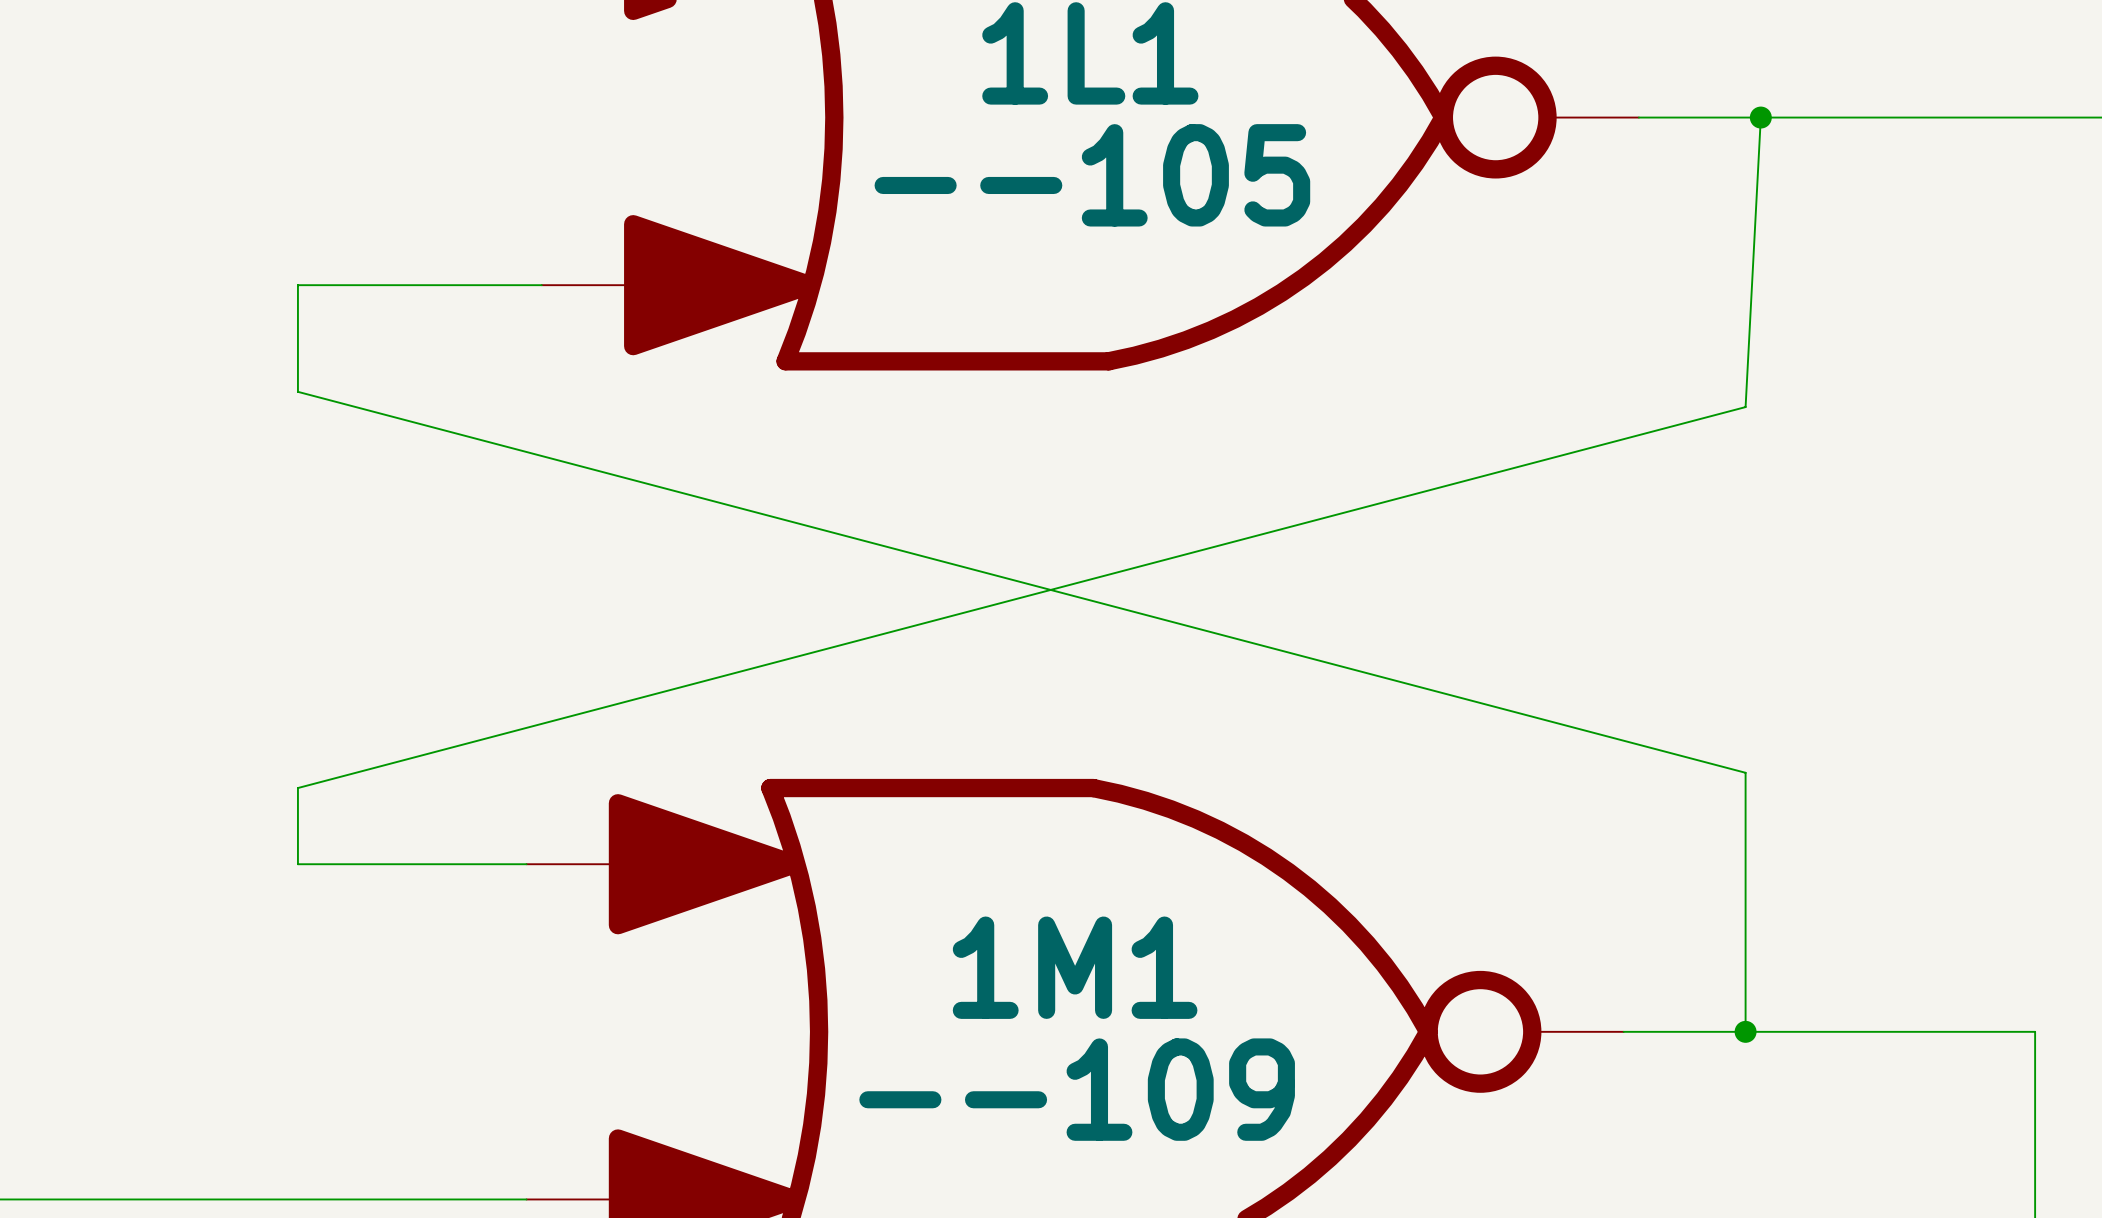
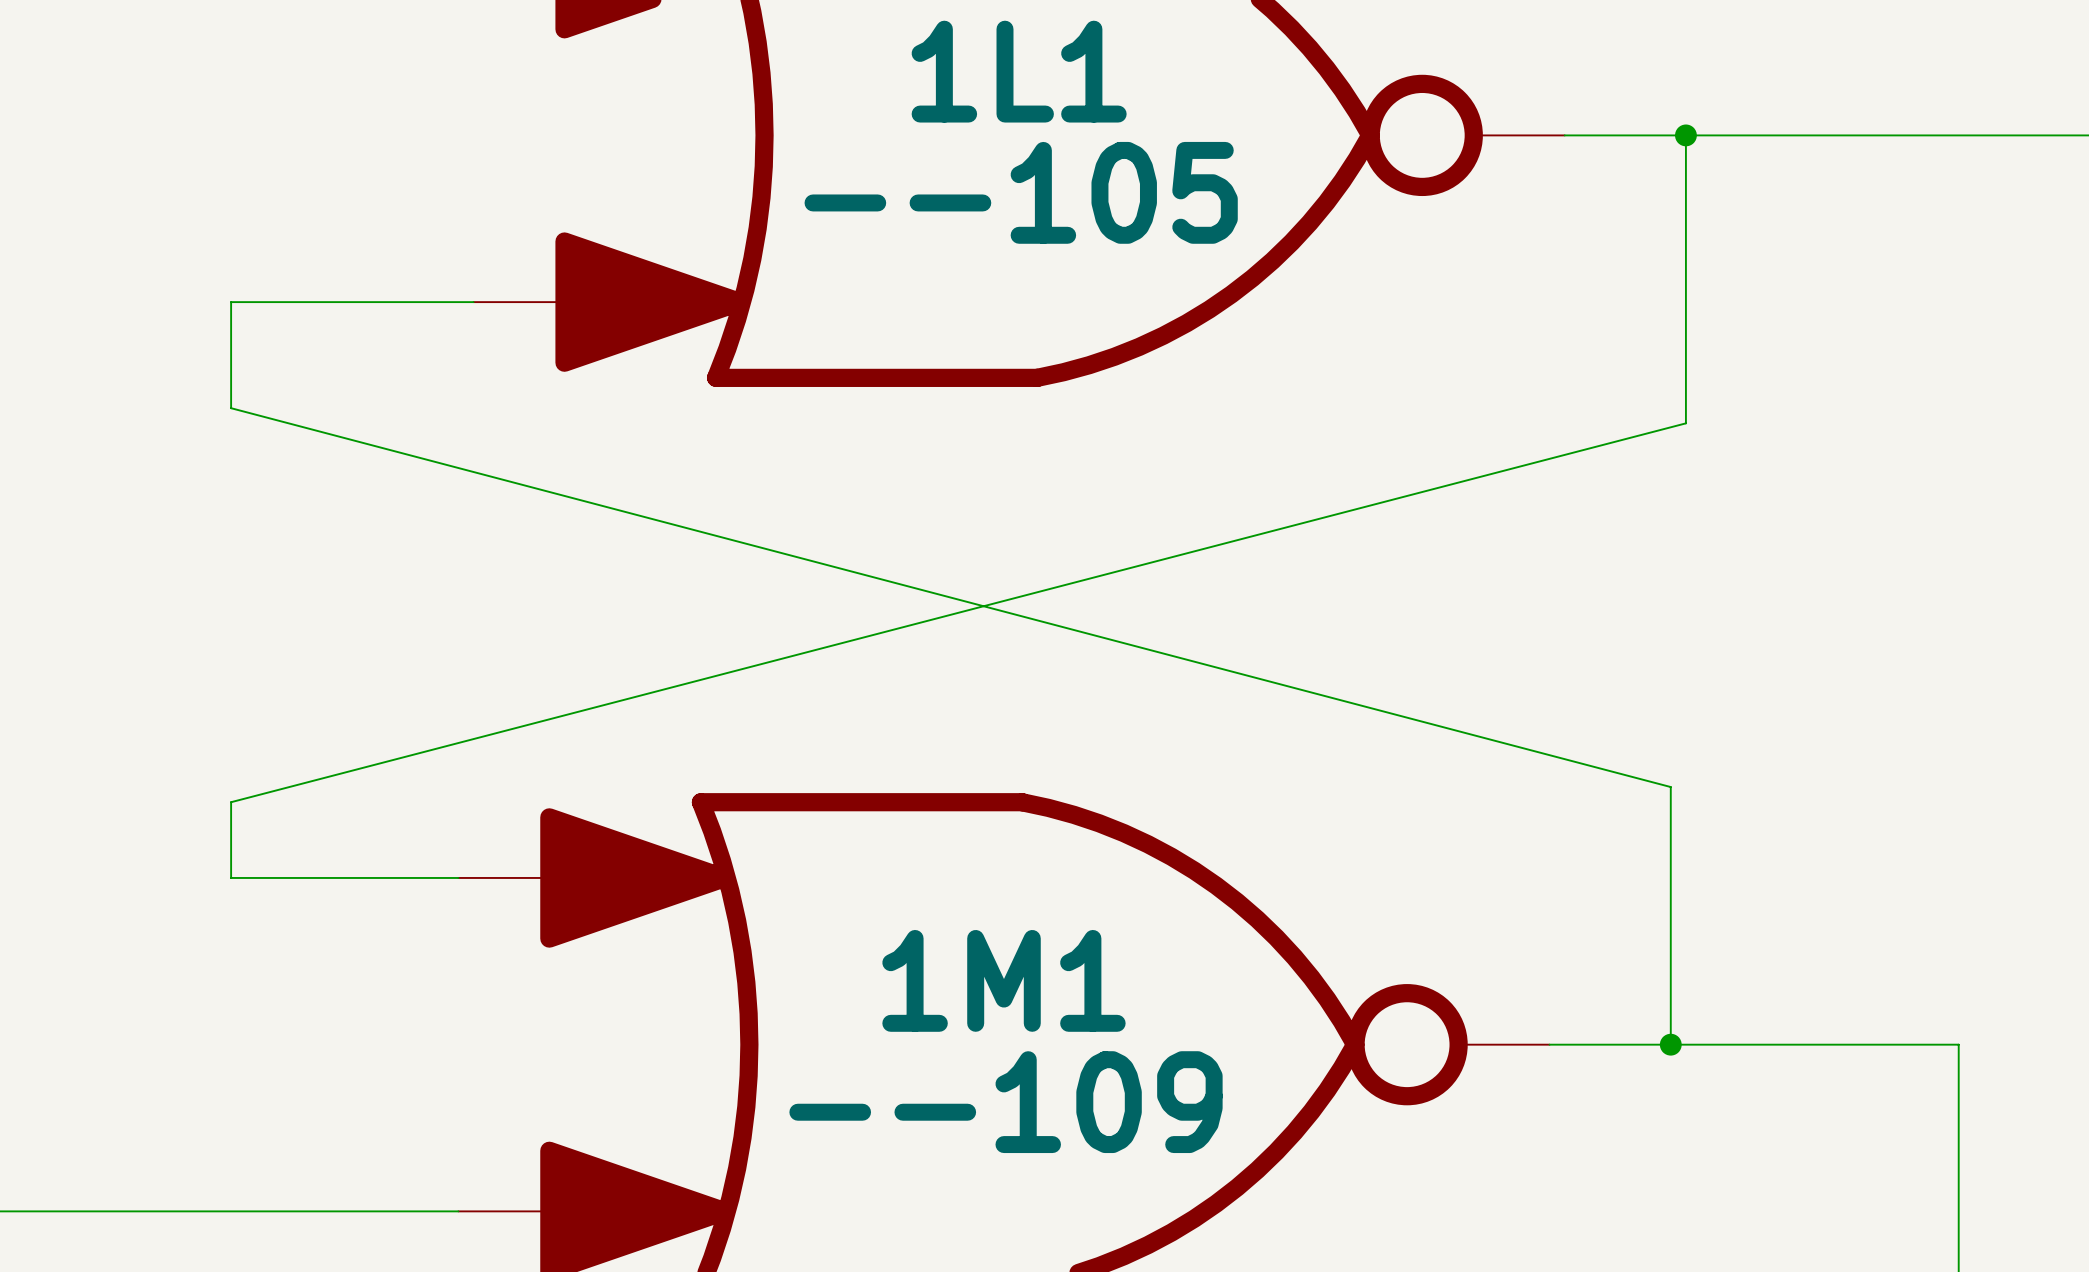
wire: (1760, 117) (1745, 407) (297, 788) -> (1685, 135) (1685, 423) (231, 802)

